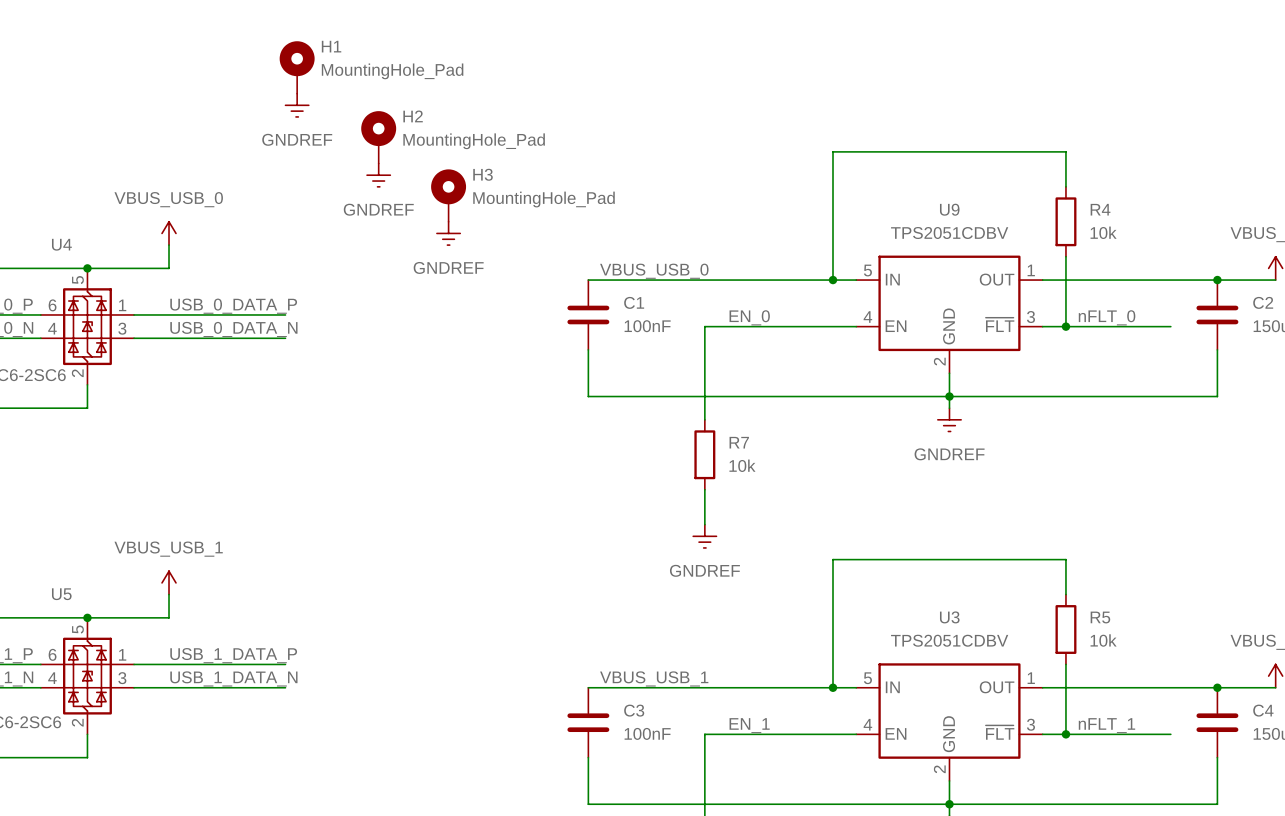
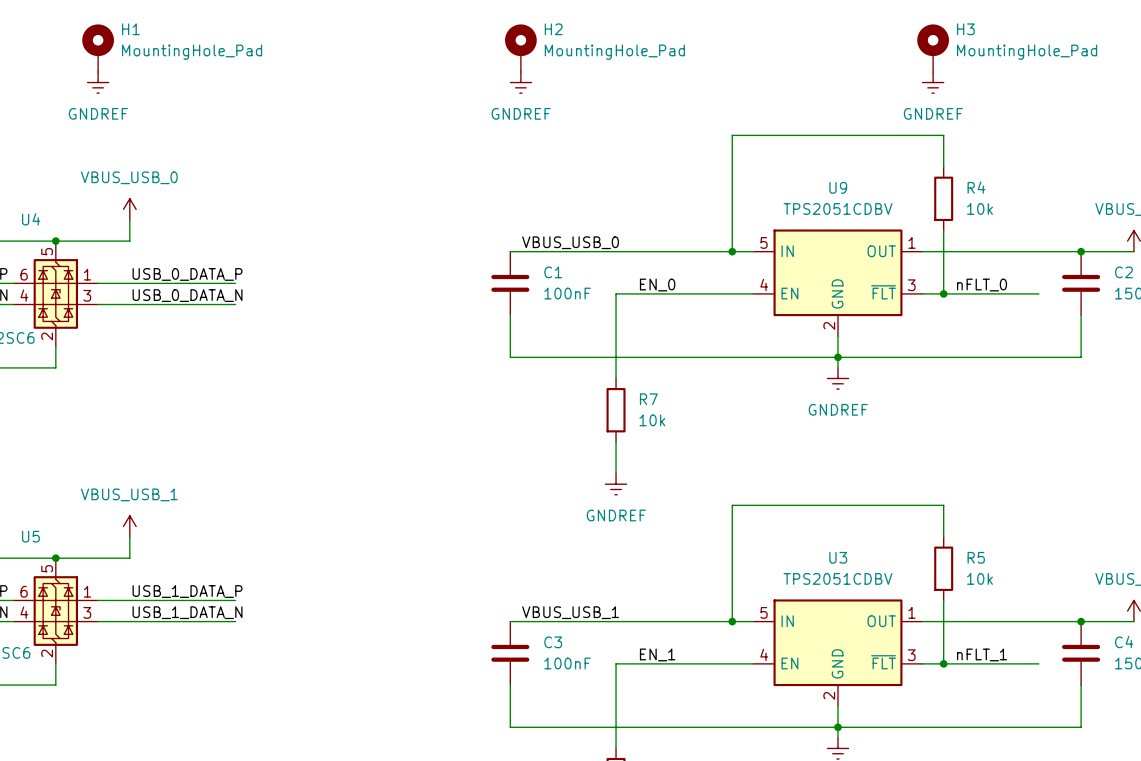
H1 position: (297, 67) -> (98, 48)
power symbol: none -> GNDREF (98, 82)
power symbol: none -> GNDREF (520, 82)
power symbol: none -> GNDREF (933, 82)
power symbol: GNDREF (297, 105) -> none
H2 position: (378, 137) -> (520, 48)
power symbol: GNDREF (378, 175) -> none
H3 position: (448, 195) -> (933, 48)
power symbol: GNDREF (448, 233) -> none

